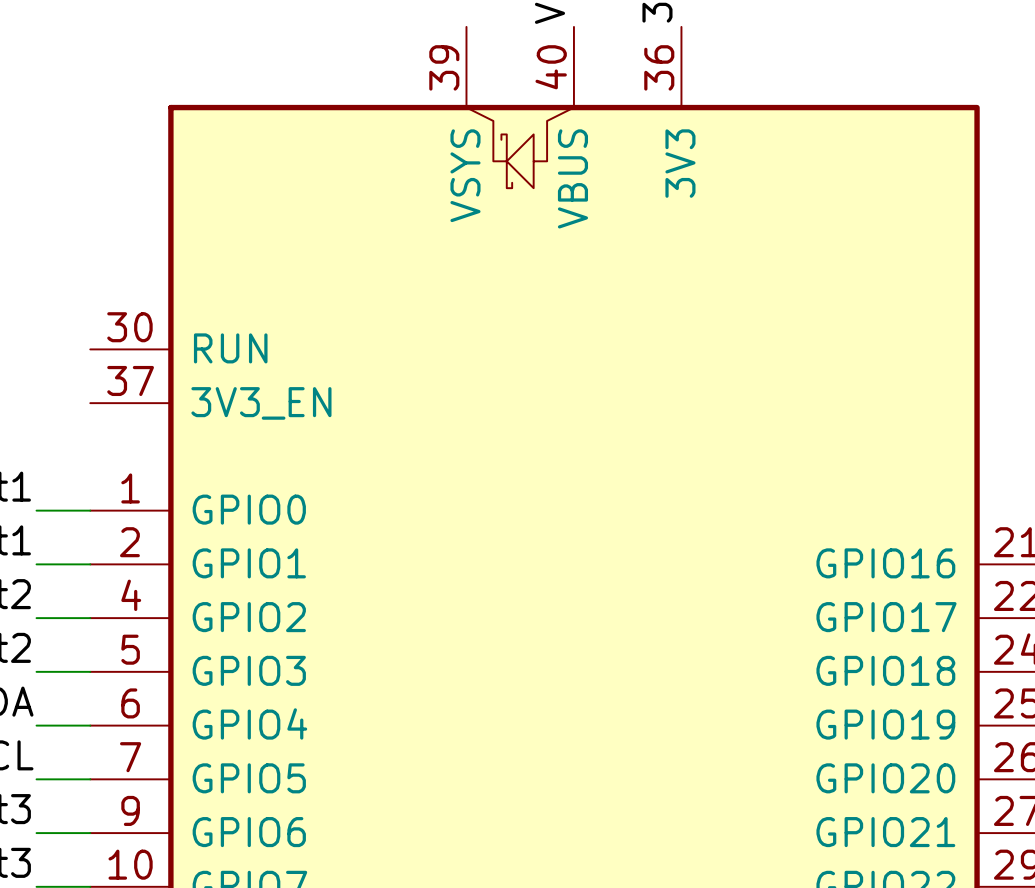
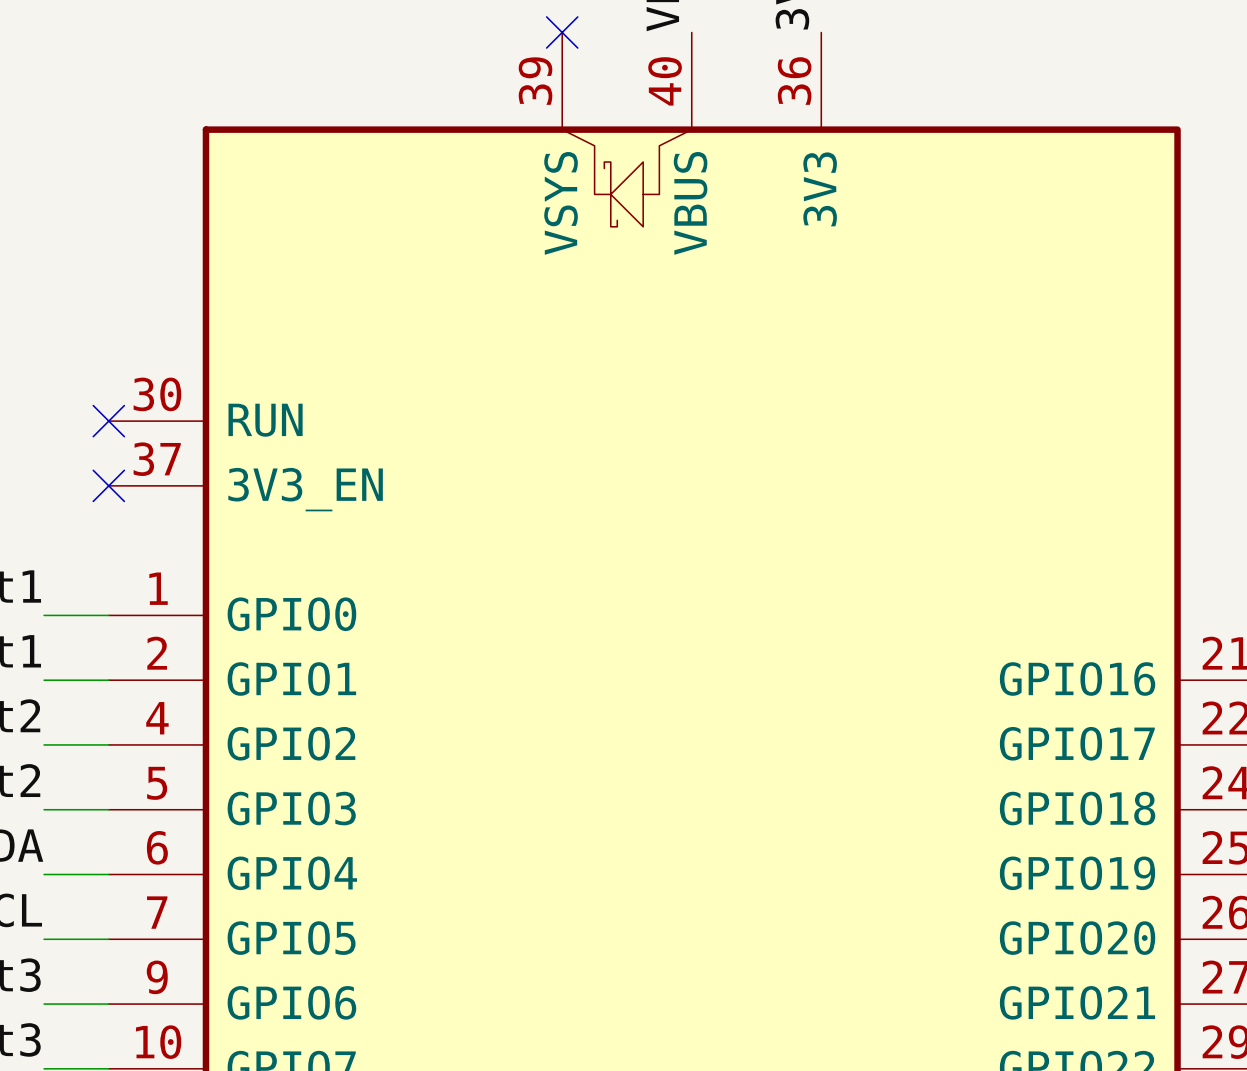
no-connect mark: none -> (562, 32)
no-connect mark: none -> (108, 421)
no-connect mark: none -> (108, 485)

